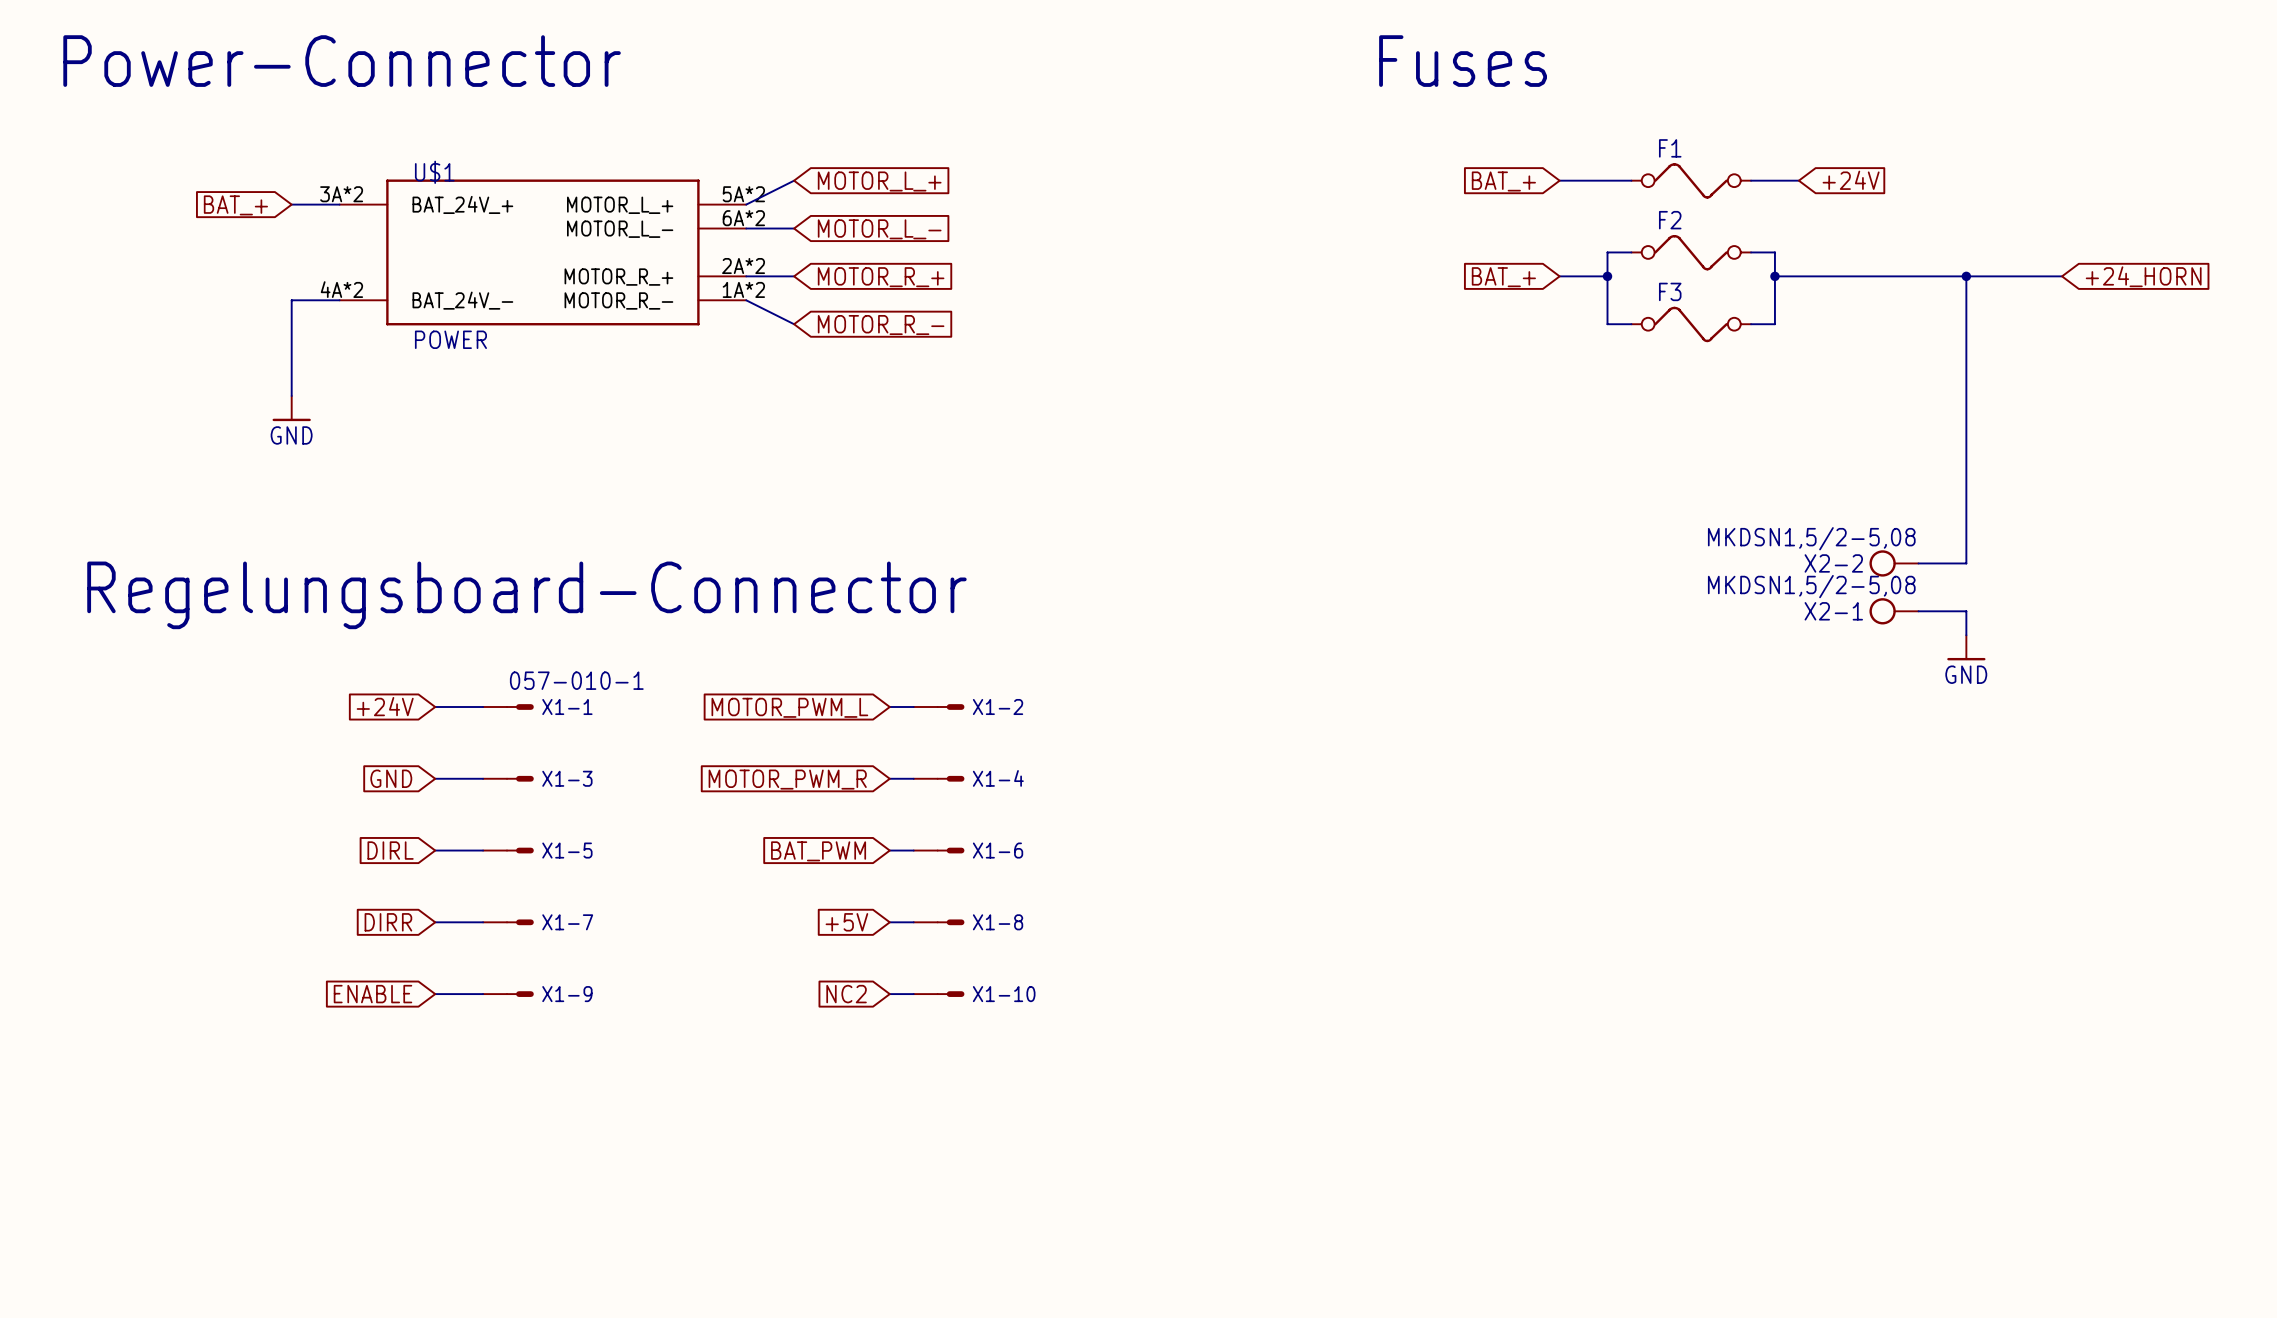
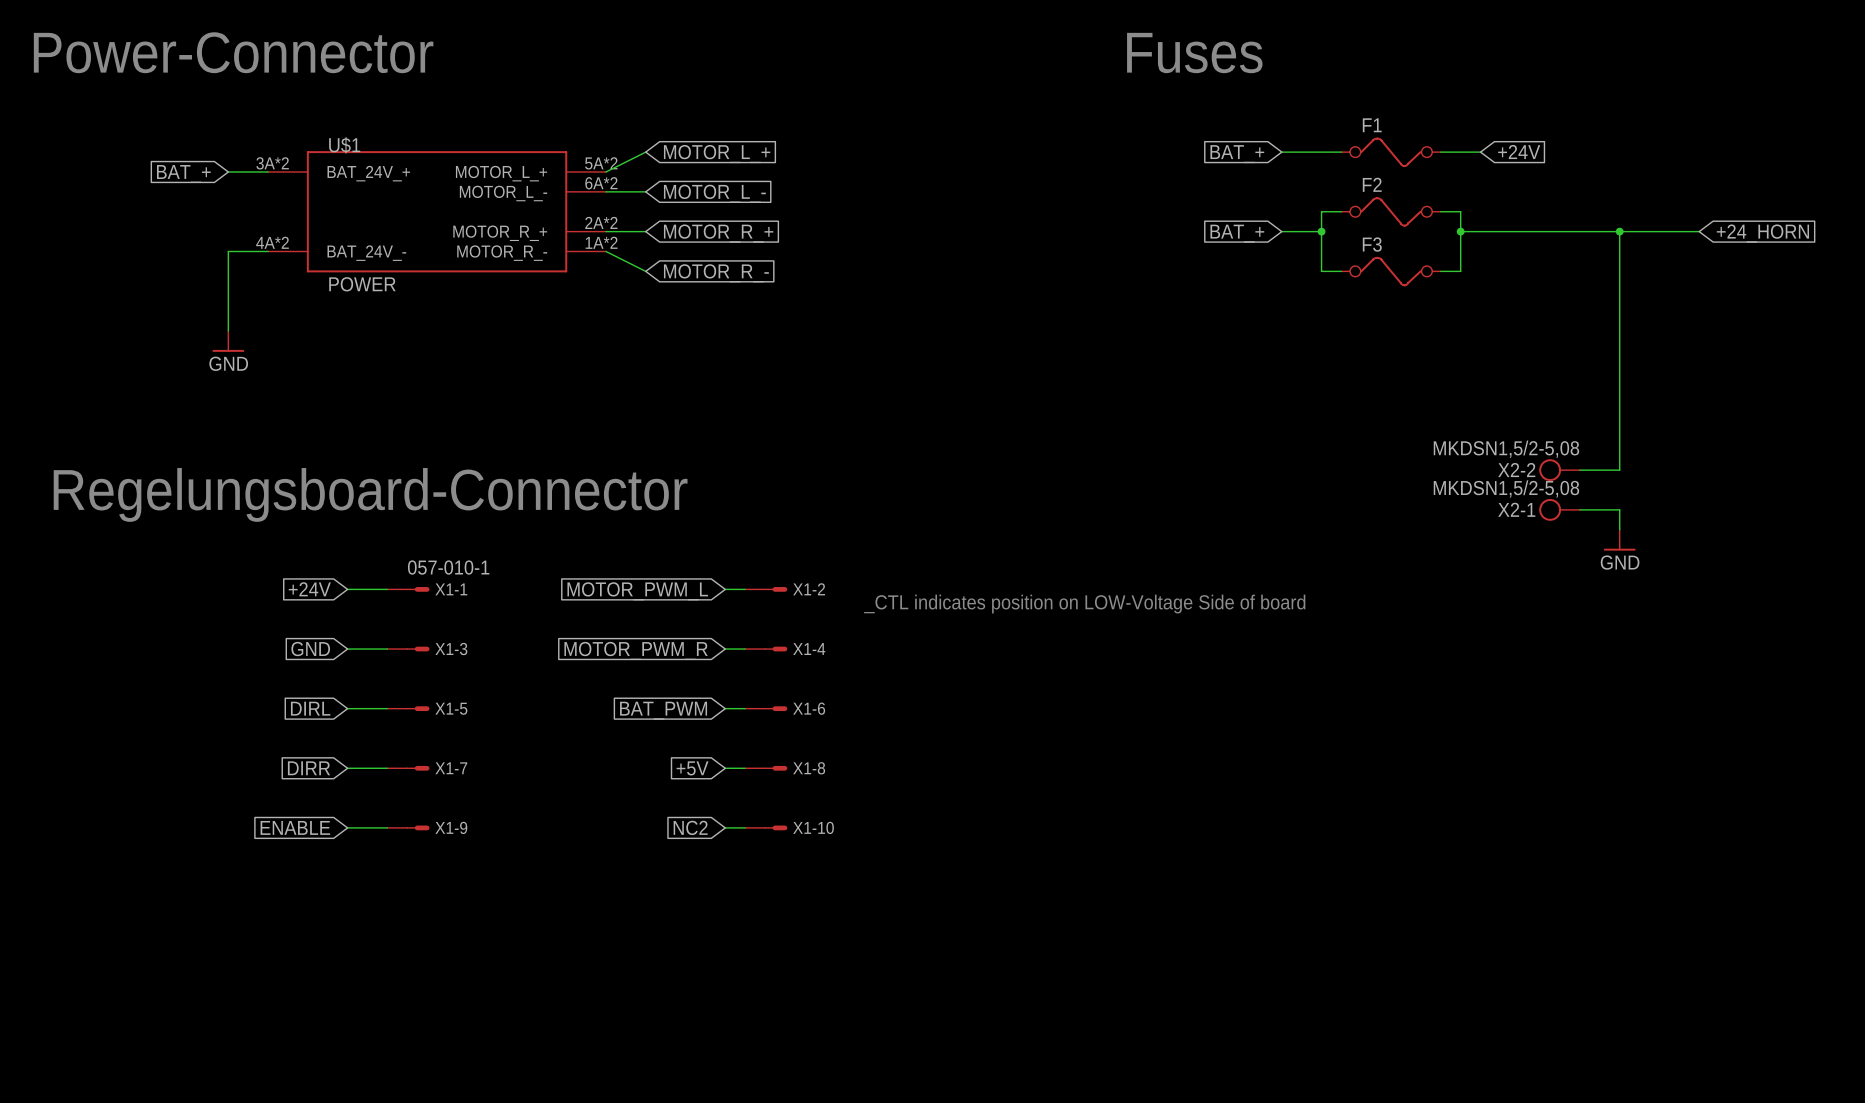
text: none -> _CTL indicates position on LOW-Voltage Side of board (1084, 604)

